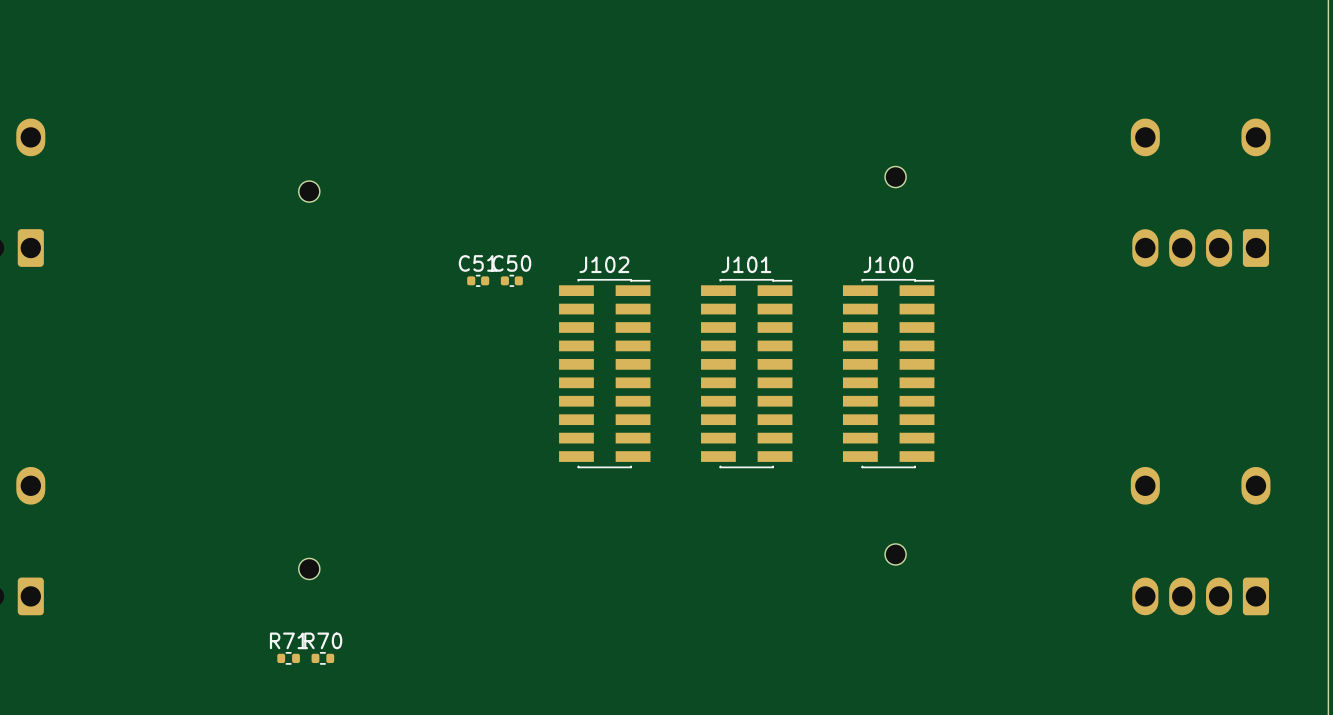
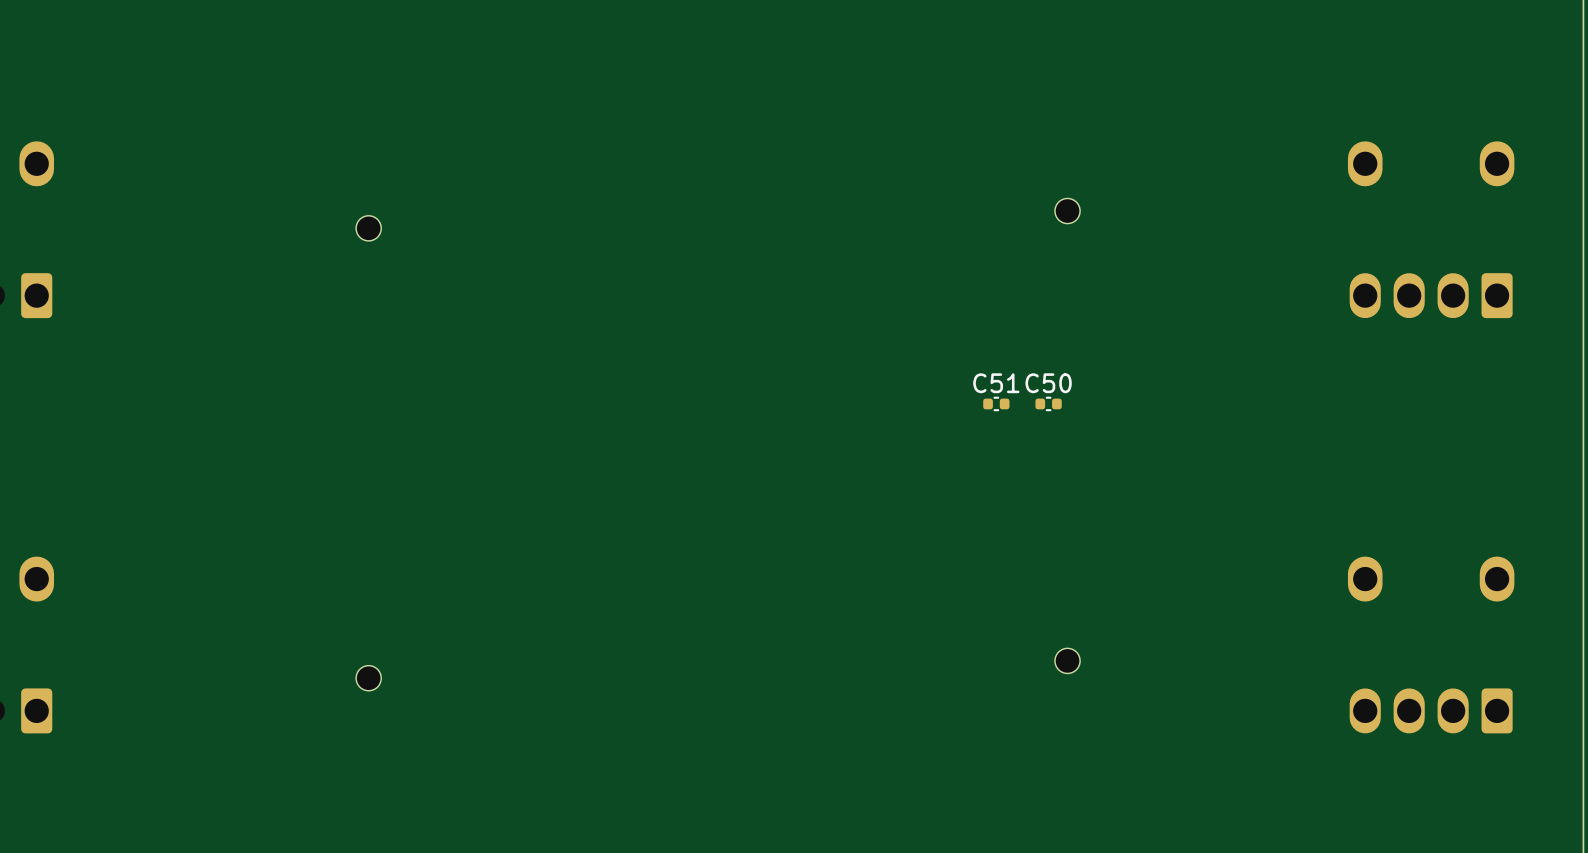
C51 position: (478, 280) -> (996, 403)
C50 position: (511, 280) -> (1048, 403)
J102: (604, 373) -> none
J101: (746, 373) -> none
J100: (888, 373) -> none
R71: (288, 658) -> none
R70: (322, 658) -> none

